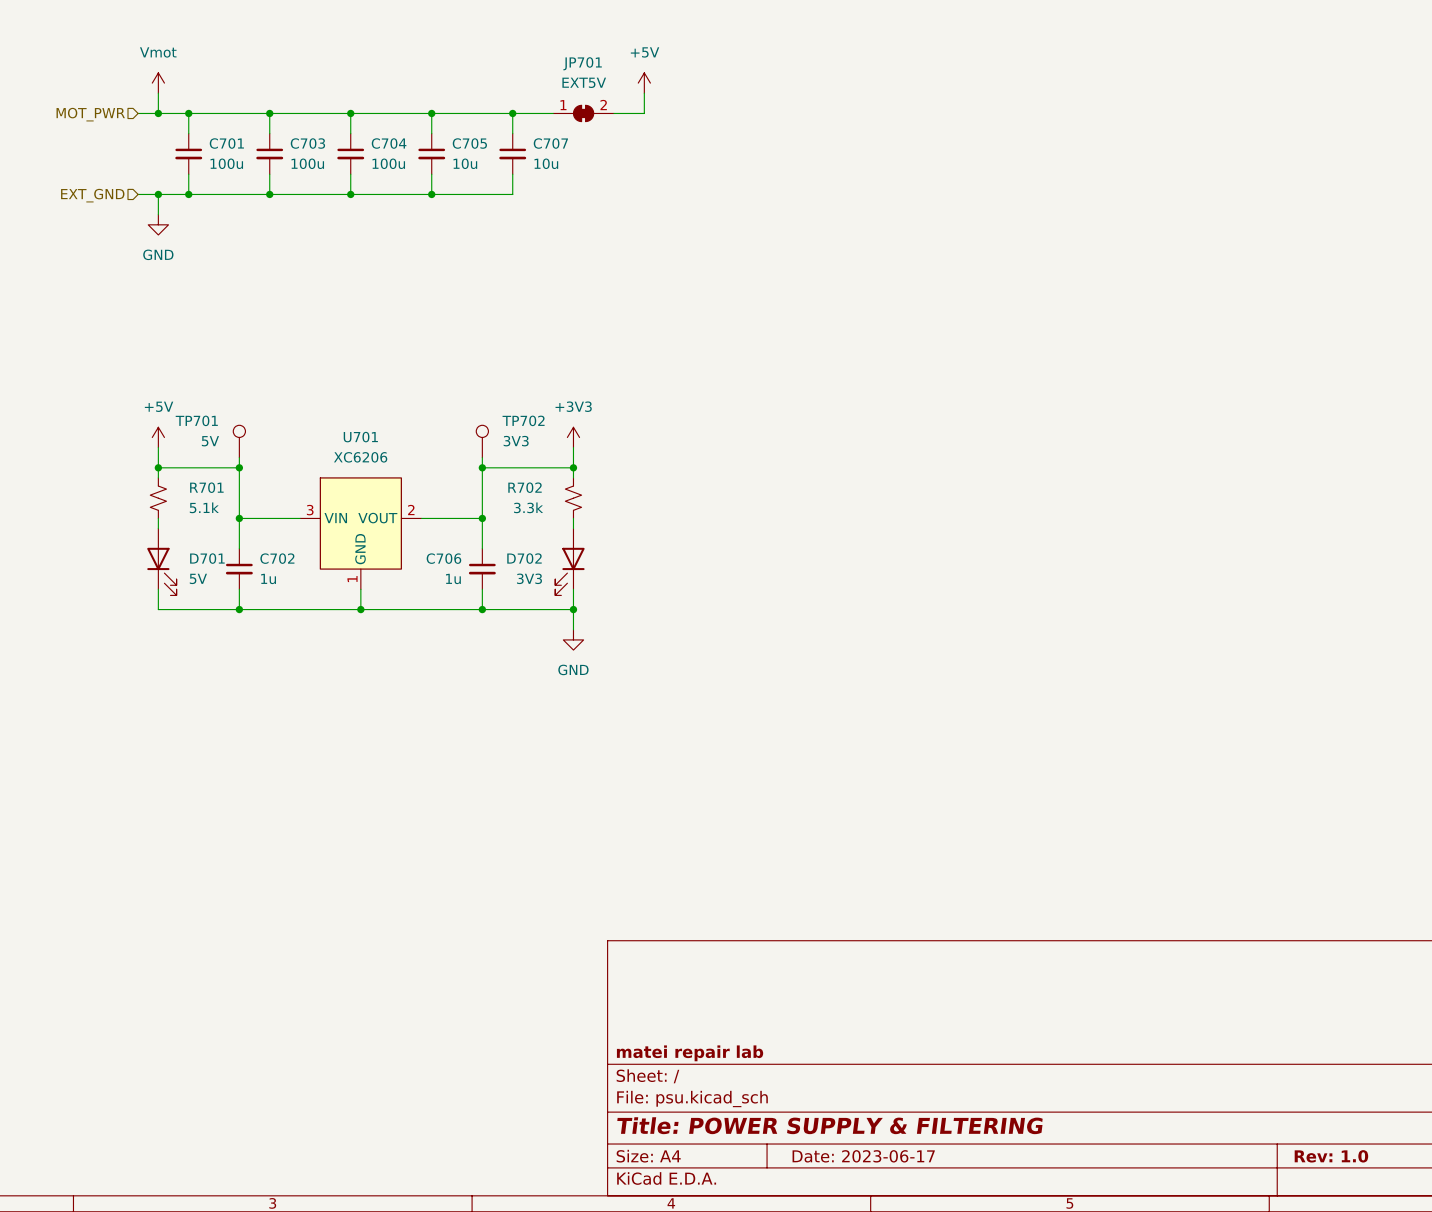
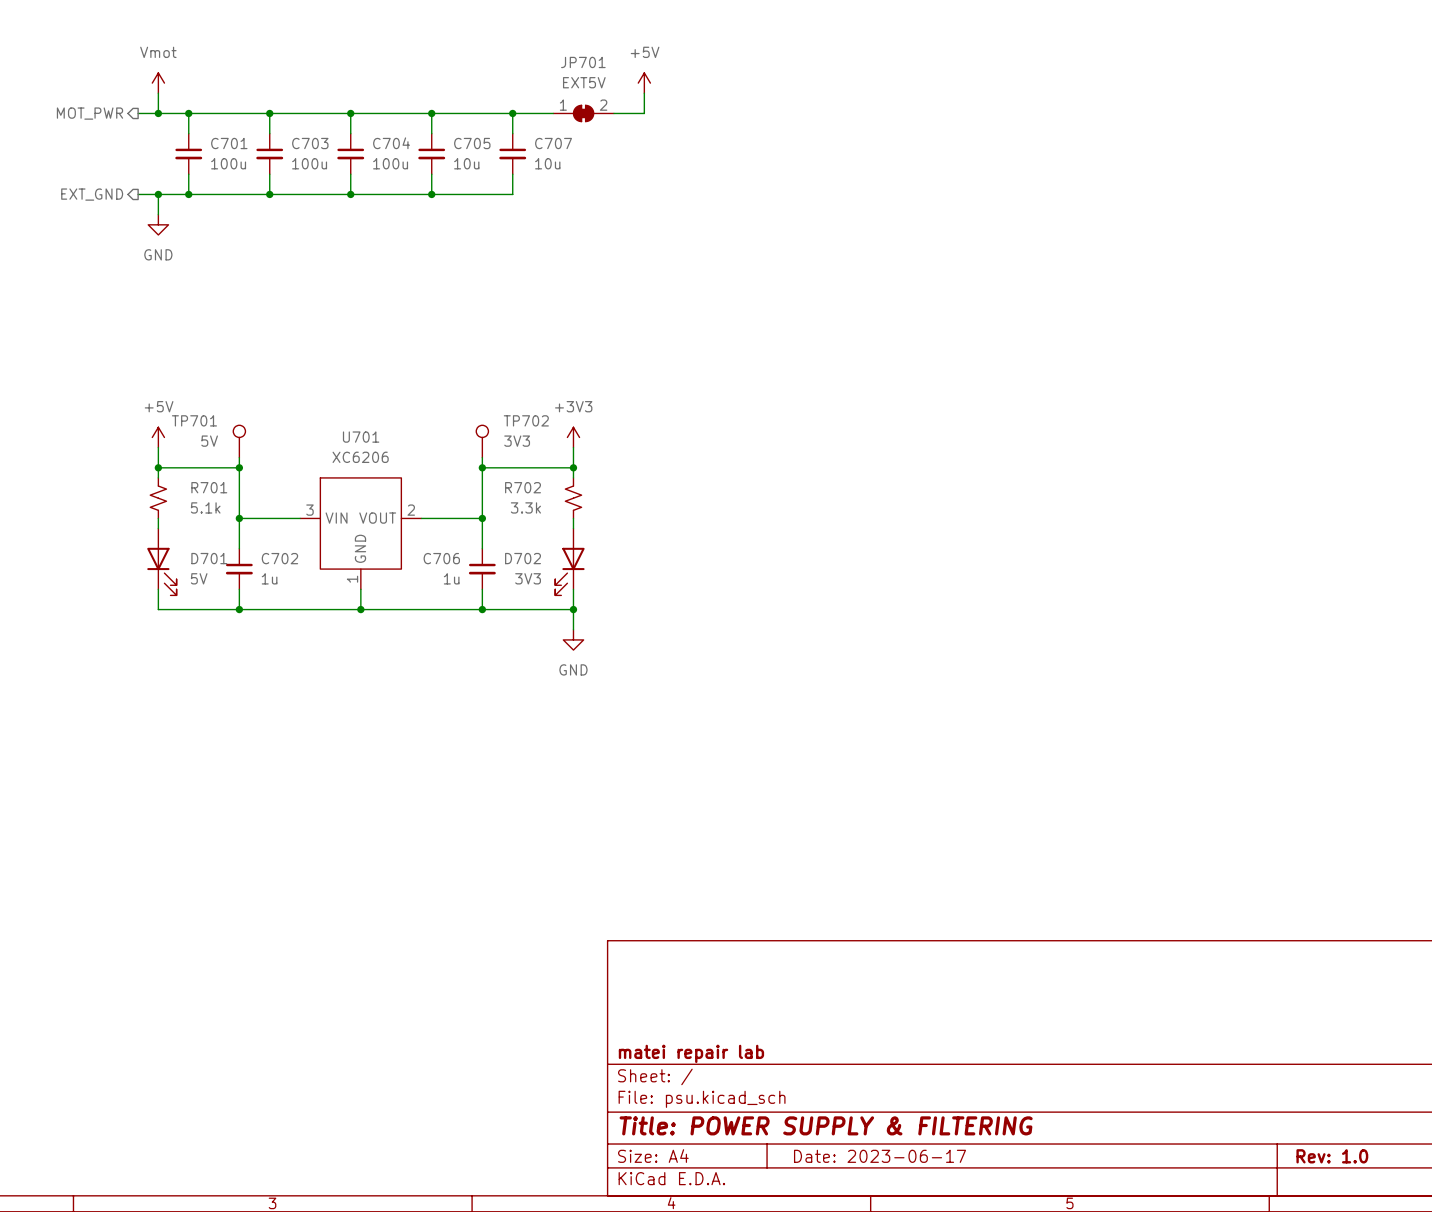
hierarchical label shape: input (90, 114) -> output (89, 113)
hierarchical label shape: input (92, 195) -> output (92, 194)

